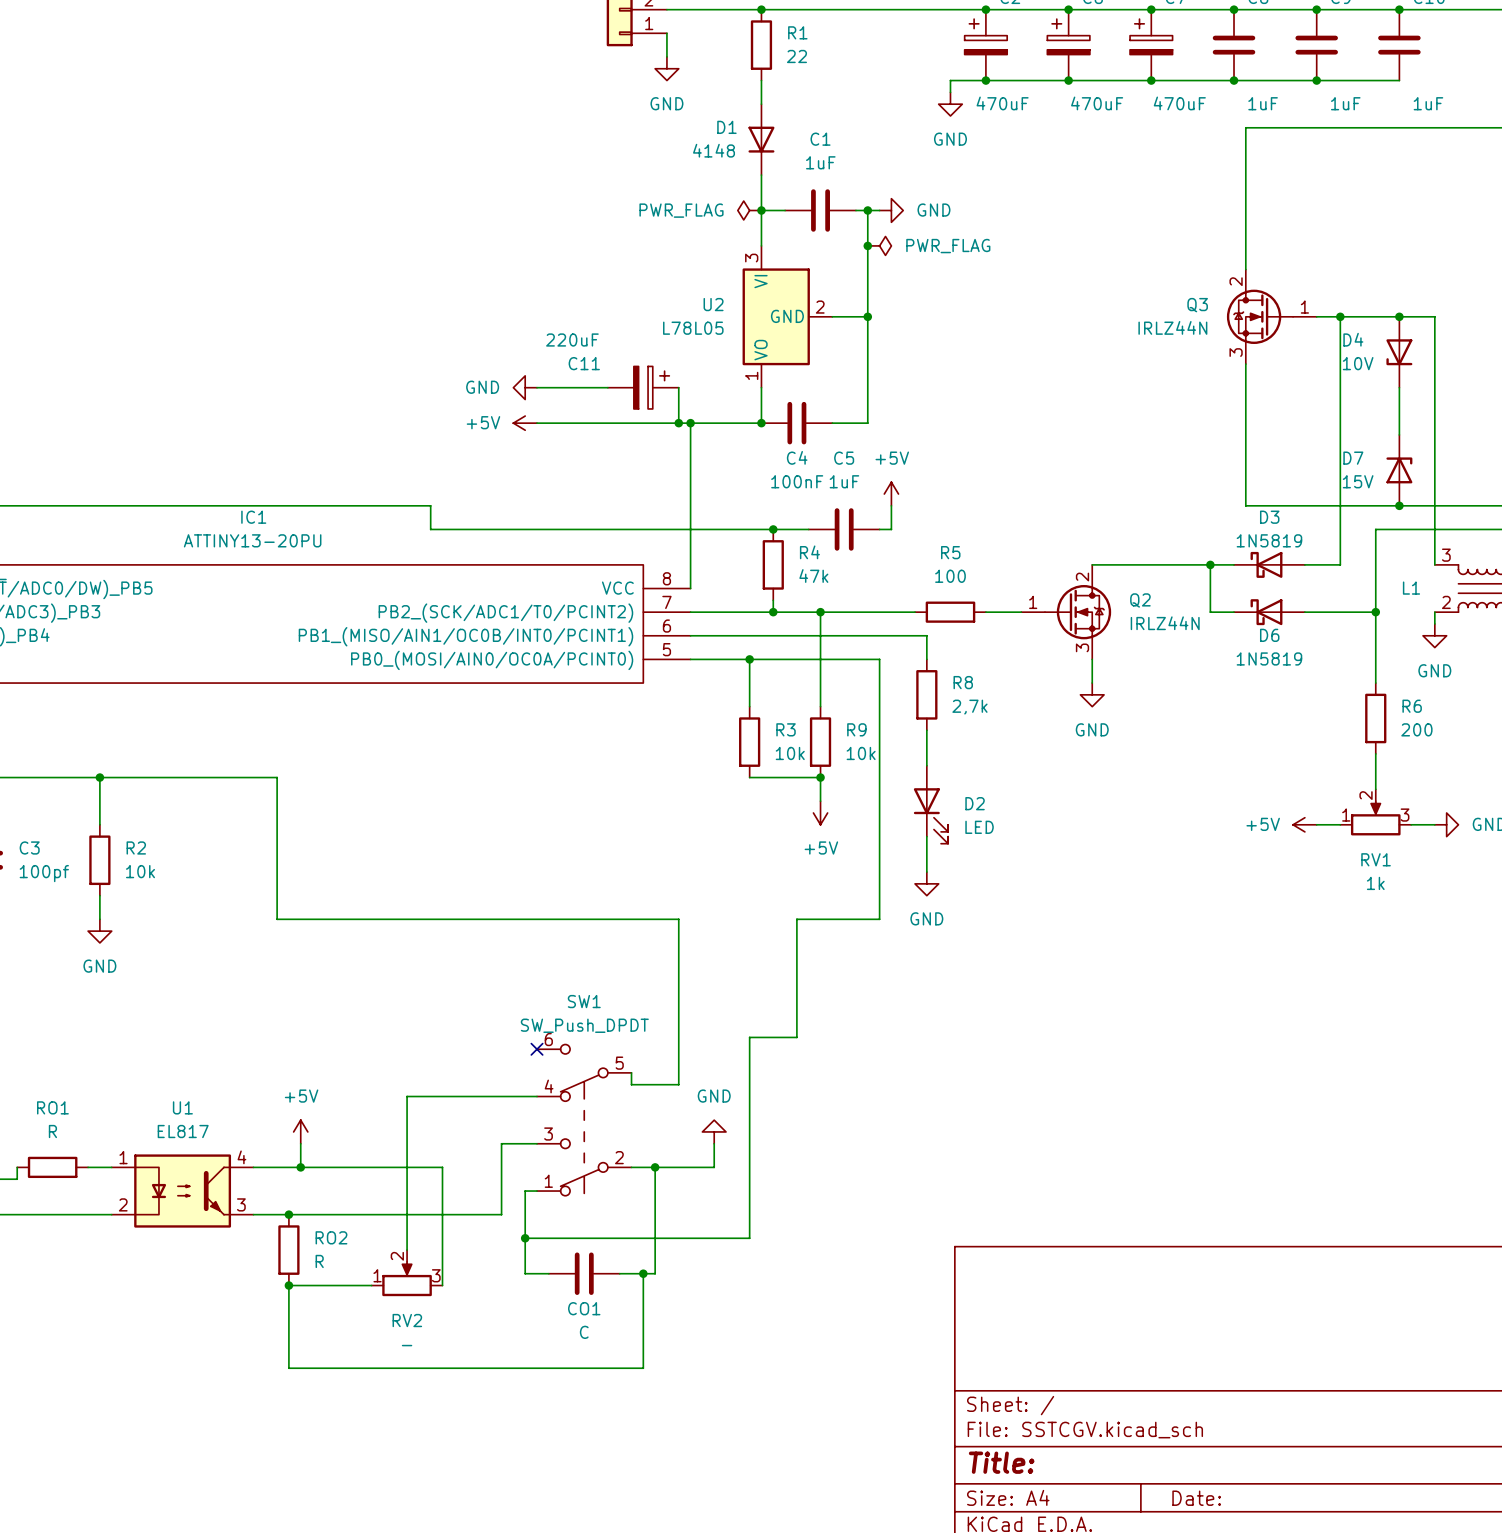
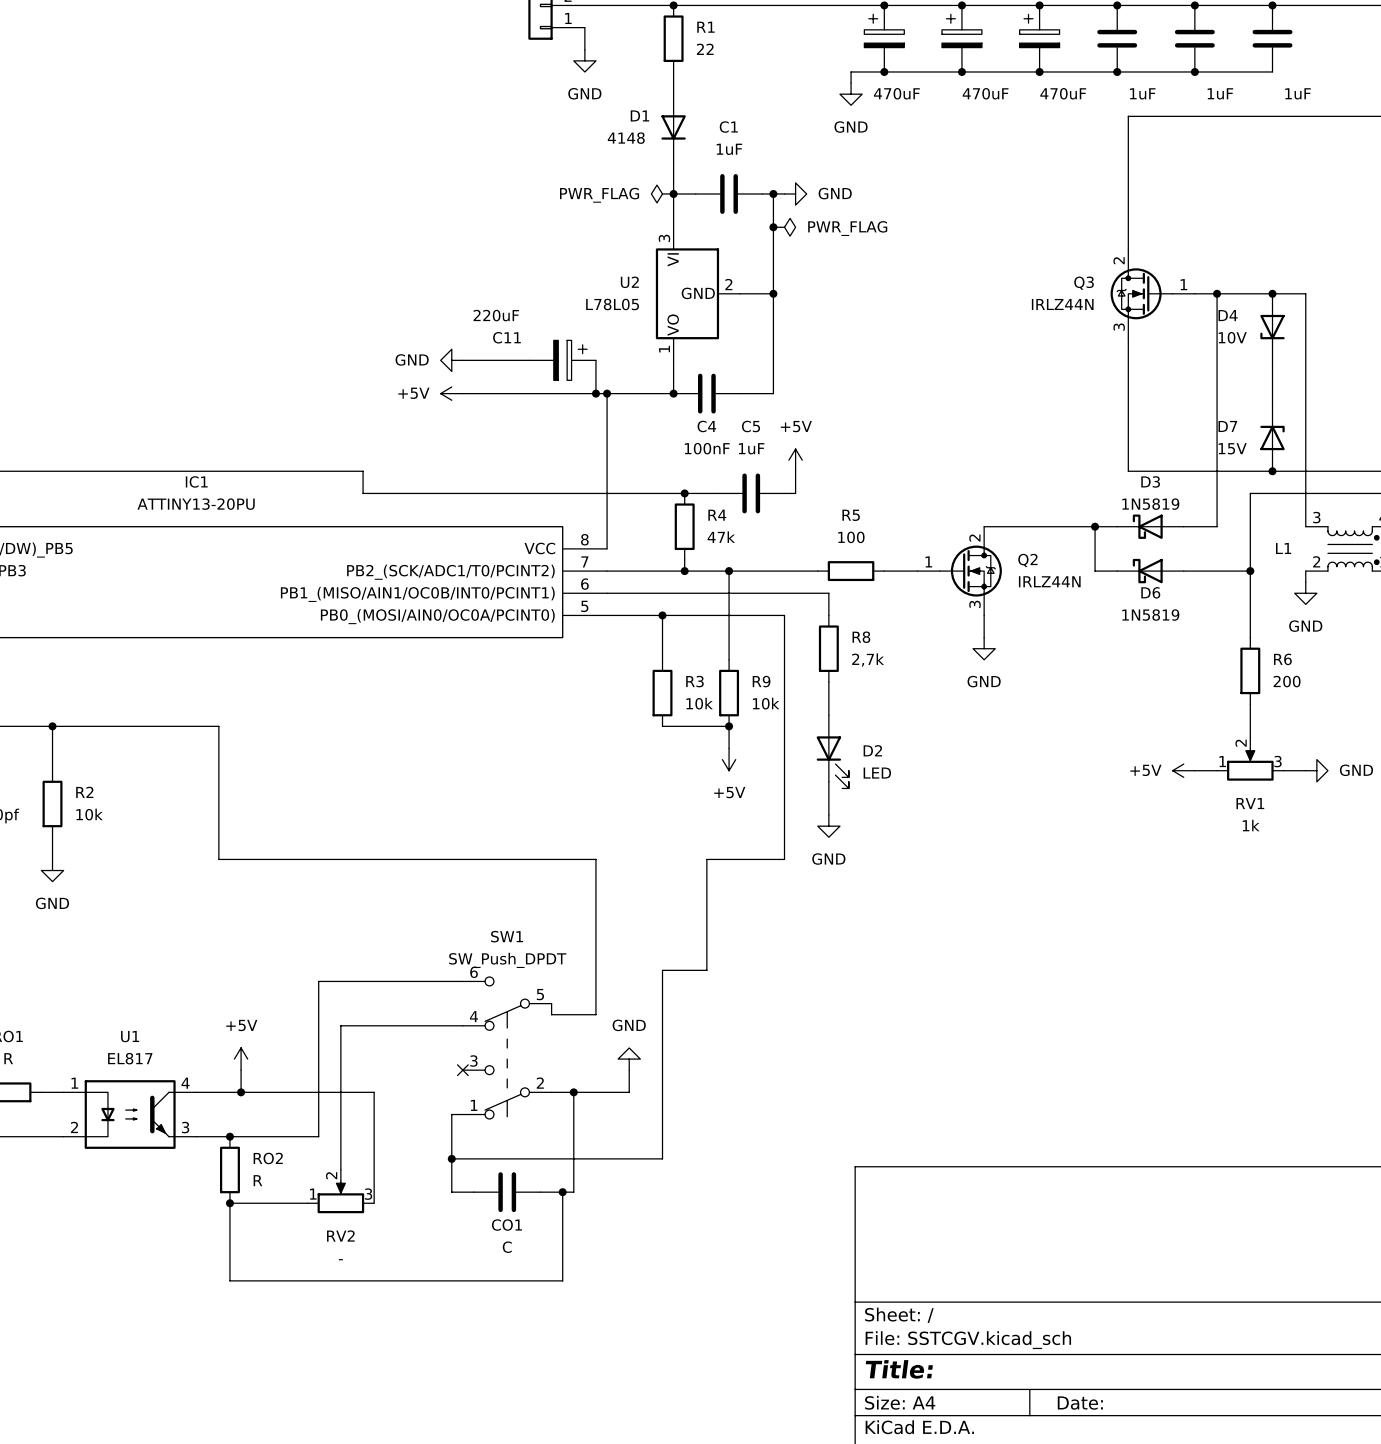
no-connect mark: (537, 1049) -> none
wire: (537, 1143) (501, 1143) (501, 1214) (383, 1214) -> (462, 981) (318, 981) (318, 1136)
no-connect mark: none -> (462, 1070)

